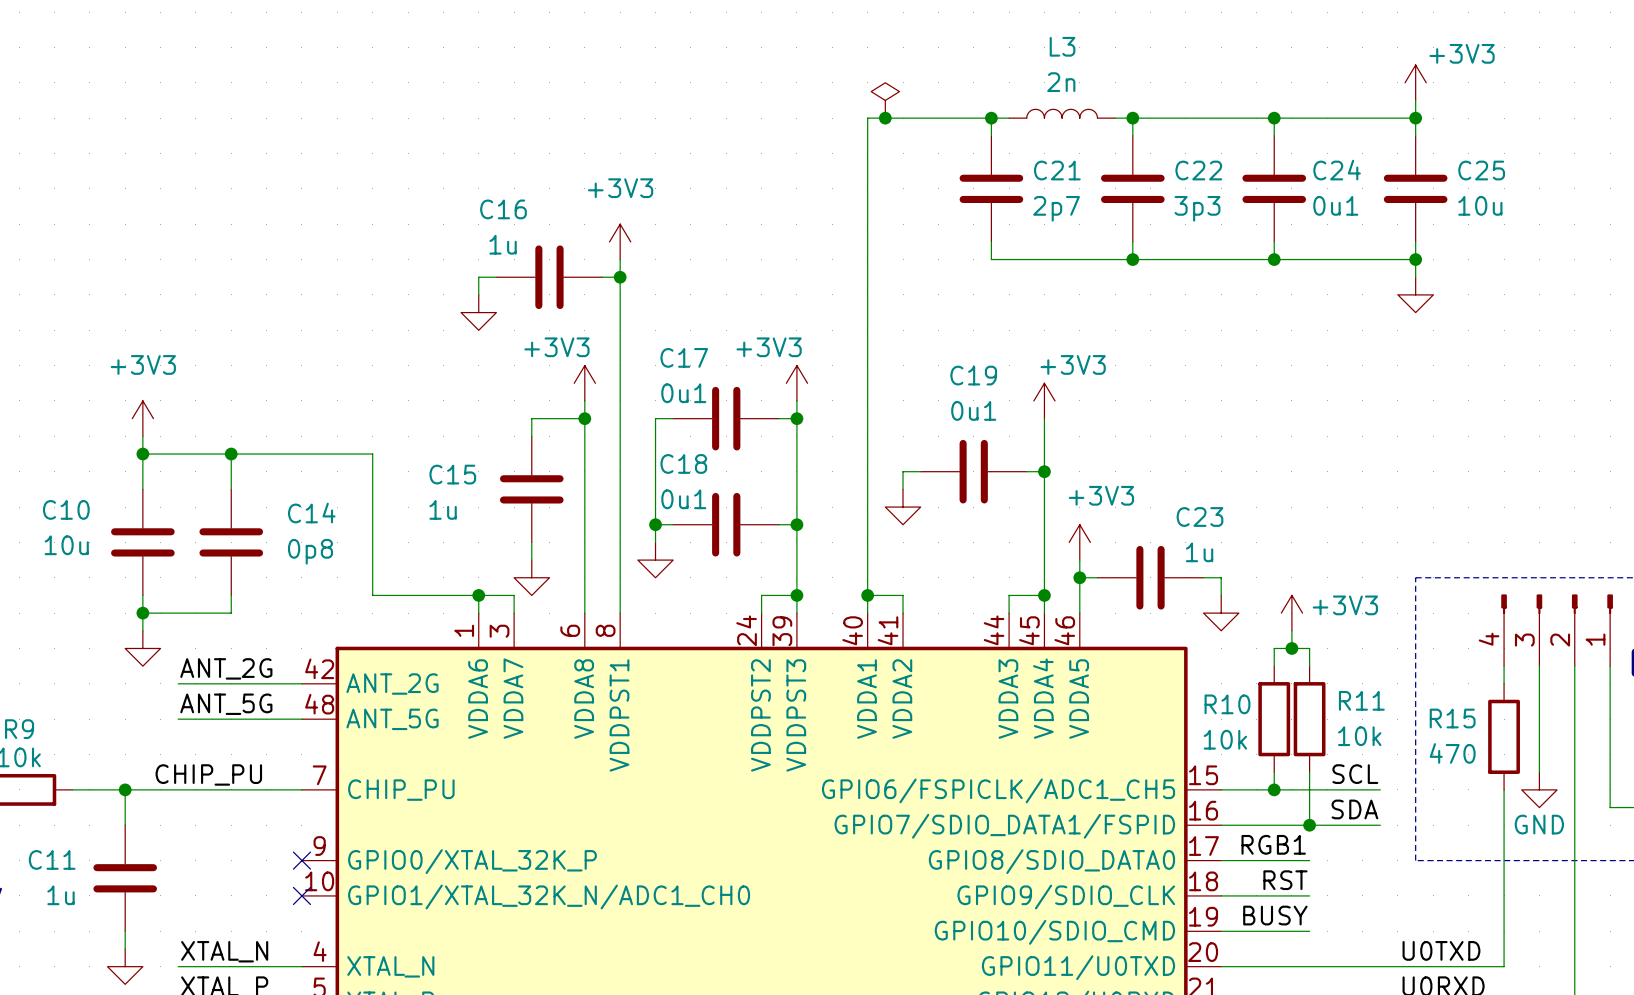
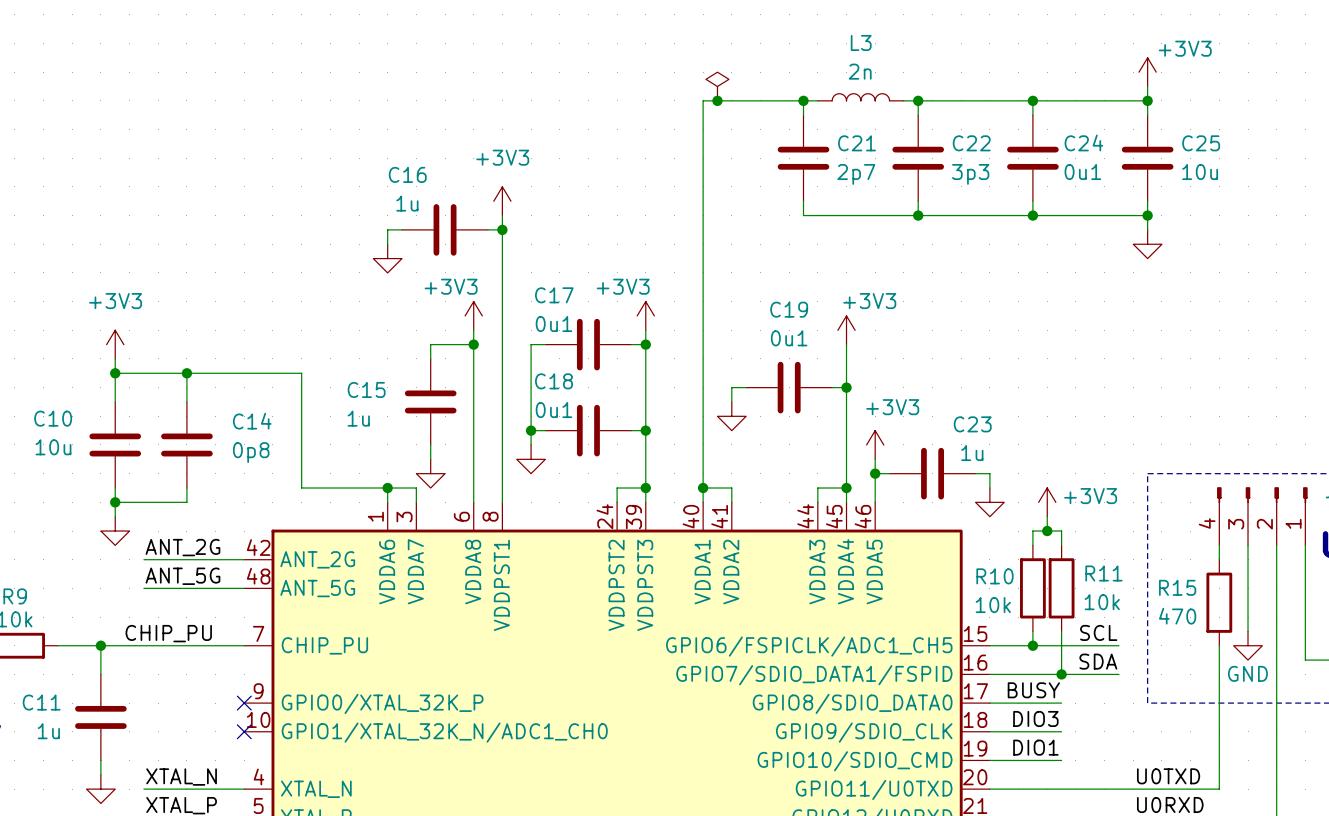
label: RGB1 (1273, 844) -> BUSY (1033, 690)
label: RST (1285, 880) -> DIO3 (1035, 718)
label: BUSY (1275, 915) -> DIO1 (1035, 747)

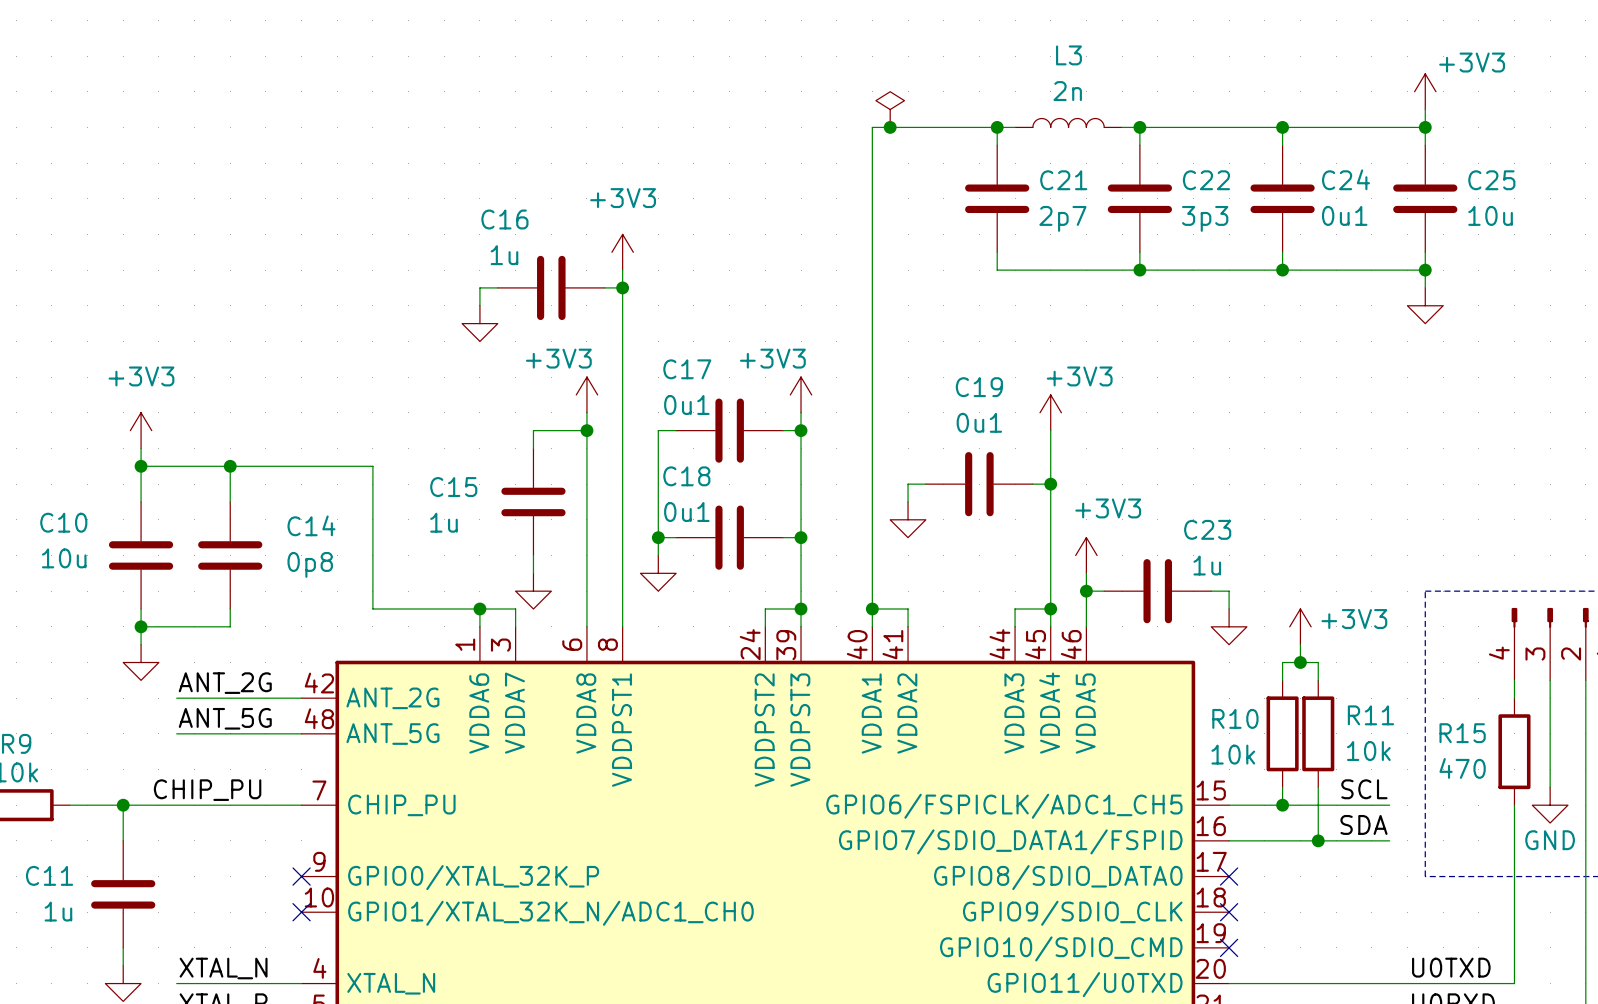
label: BUSY (1033, 690) -> none
wire: (989, 703) (1061, 703) -> none
no-connect mark: none -> (1229, 876)
label: DIO3 (1035, 718) -> none
wire: (989, 731) (1061, 731) -> none
no-connect mark: none -> (1229, 912)
label: DIO1 (1035, 747) -> none
wire: (989, 760) (1061, 760) -> none
no-connect mark: none -> (1229, 947)

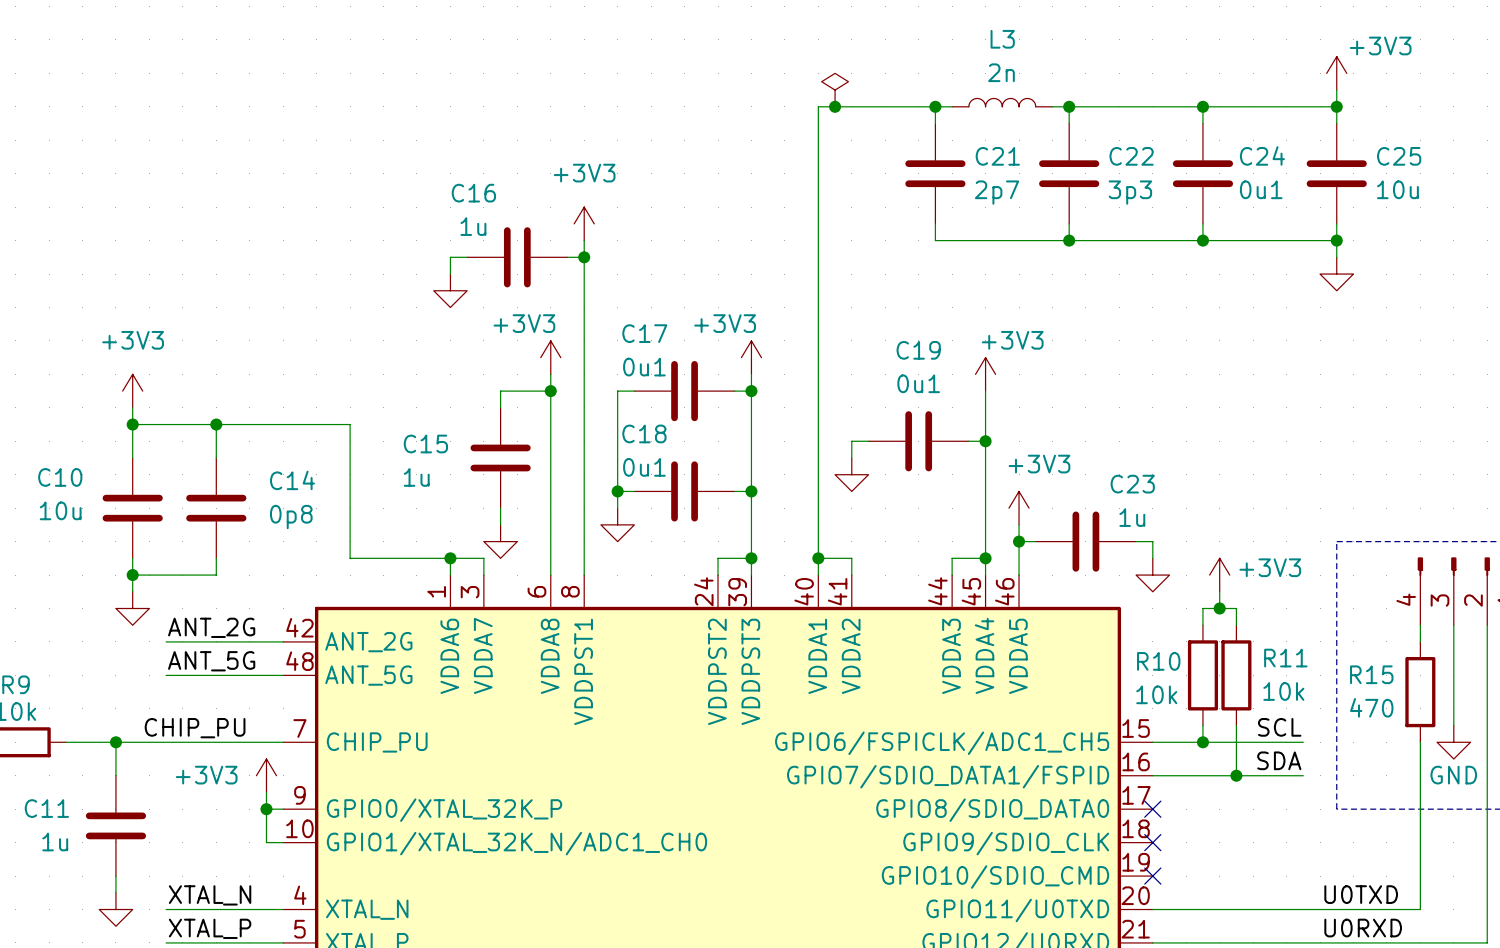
power symbol: none -> +3V3 (266, 775)
wire: none -> (266, 792) (266, 842) (283, 842)
wire: none -> (266, 809) (283, 809)
junction: none -> (266, 809)
no-connect mark: (301, 876) -> none
no-connect mark: (301, 912) -> none

